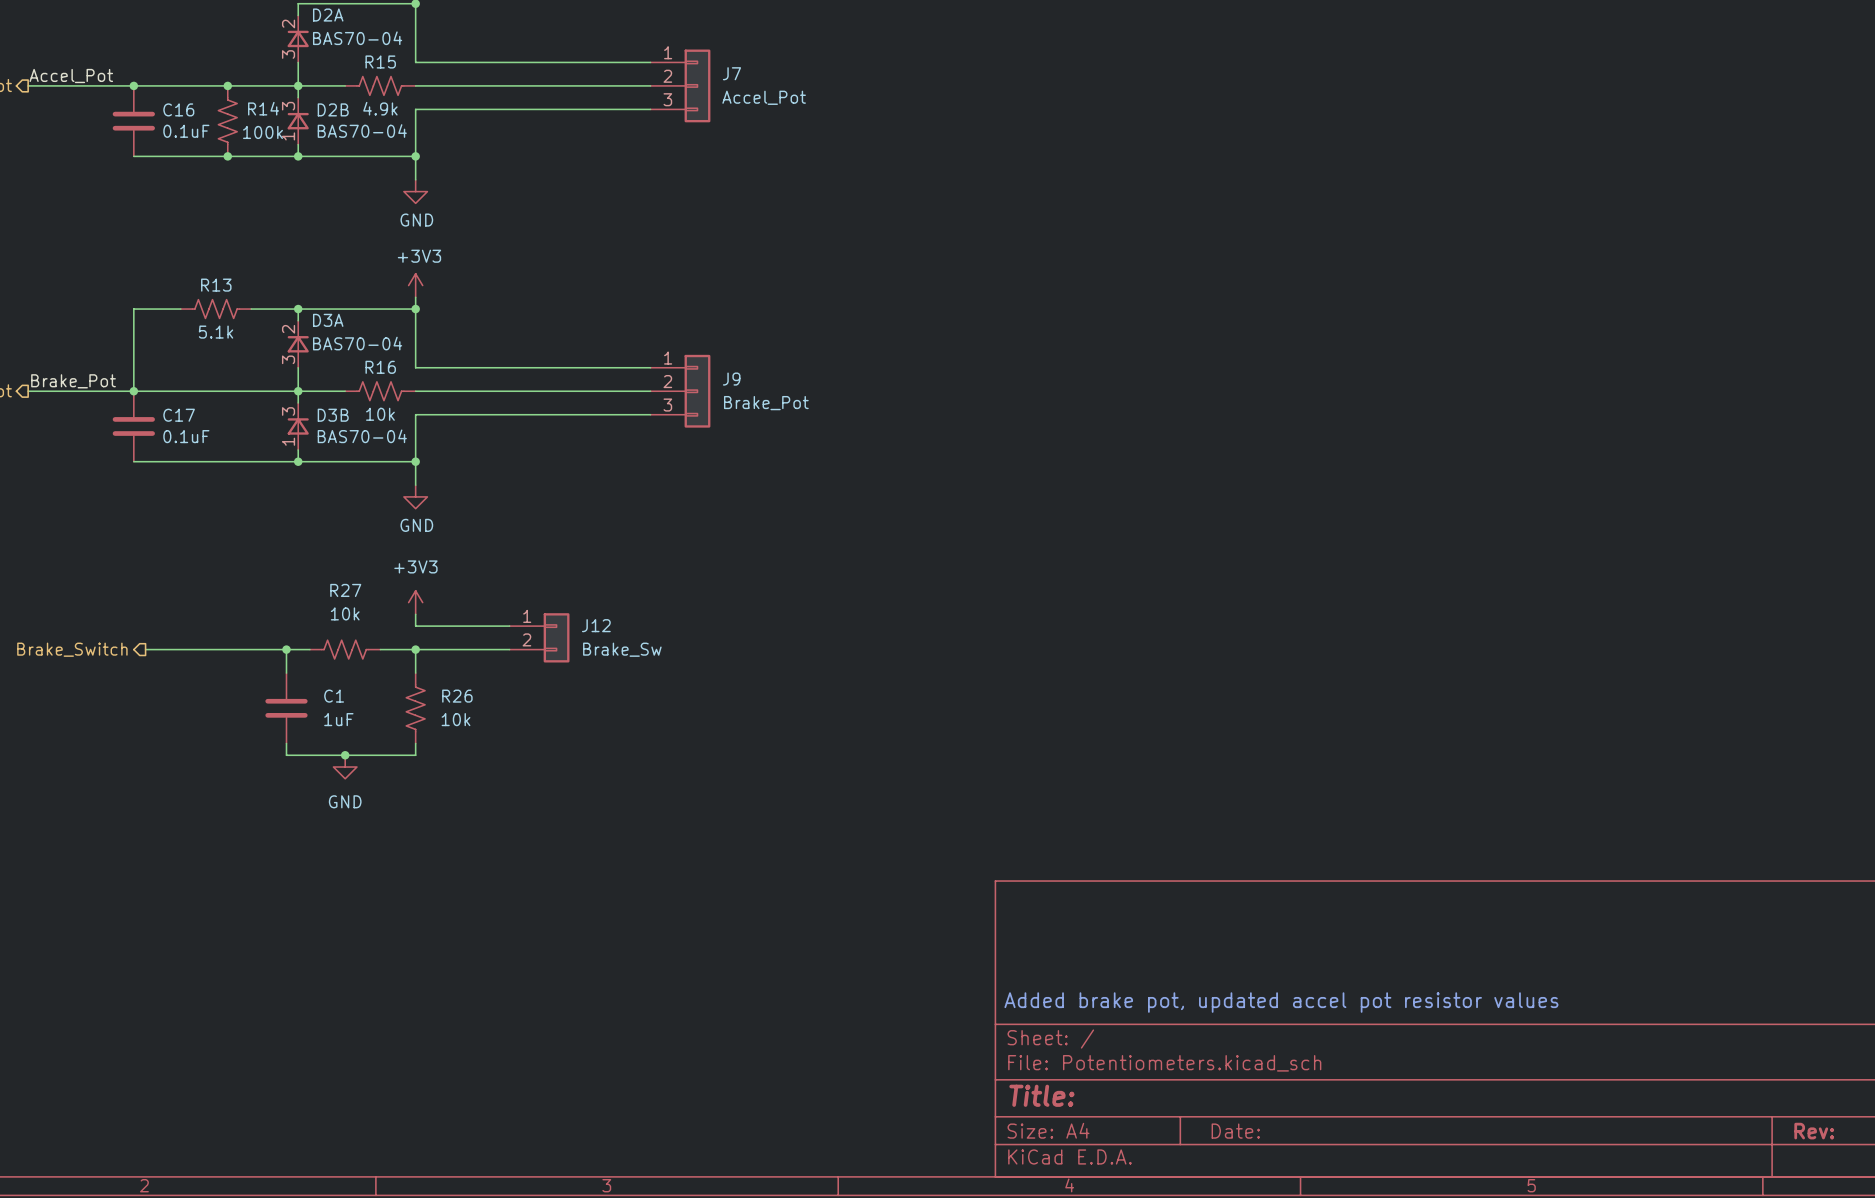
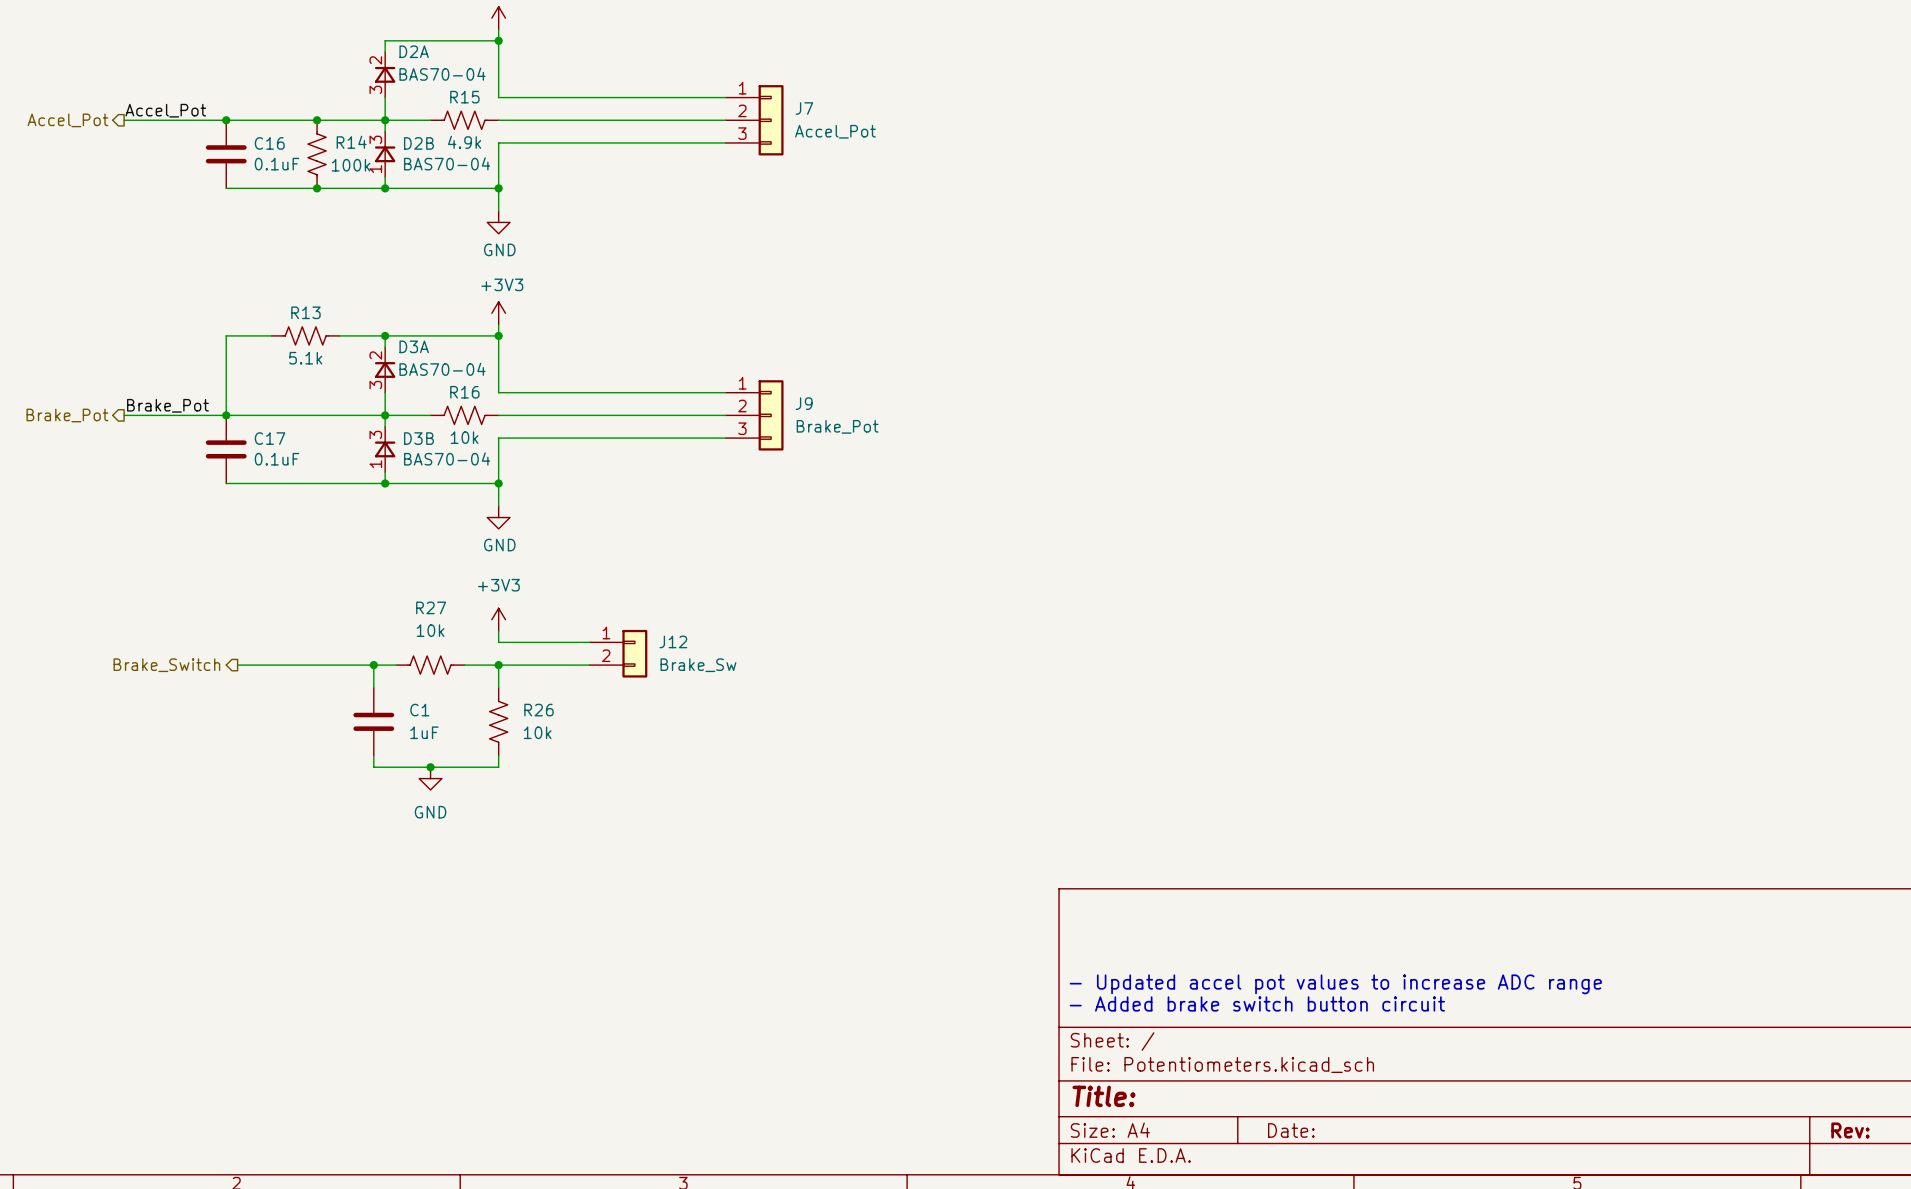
text: none -> - Updated accel pot values to increase ADC range (1335, 984)
text: Added brake pot, updated accel pot resistor values (1281, 1002) -> - Added brake switch button circuit (1257, 1003)

